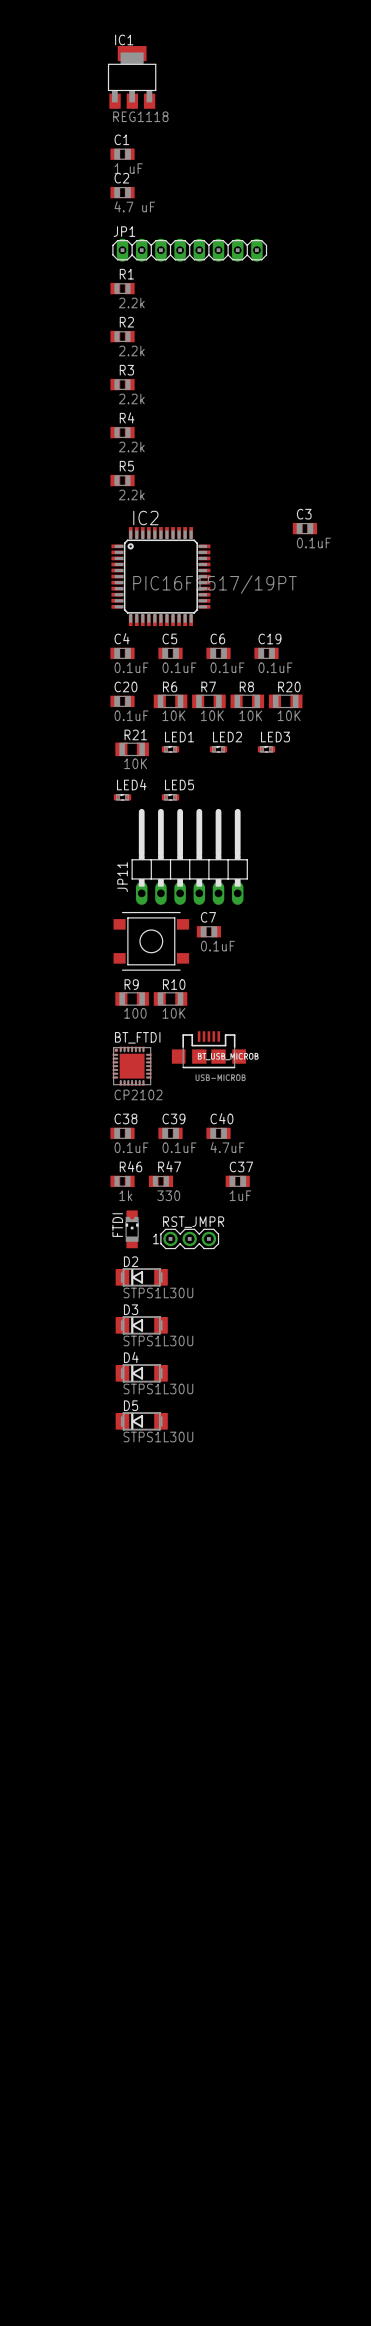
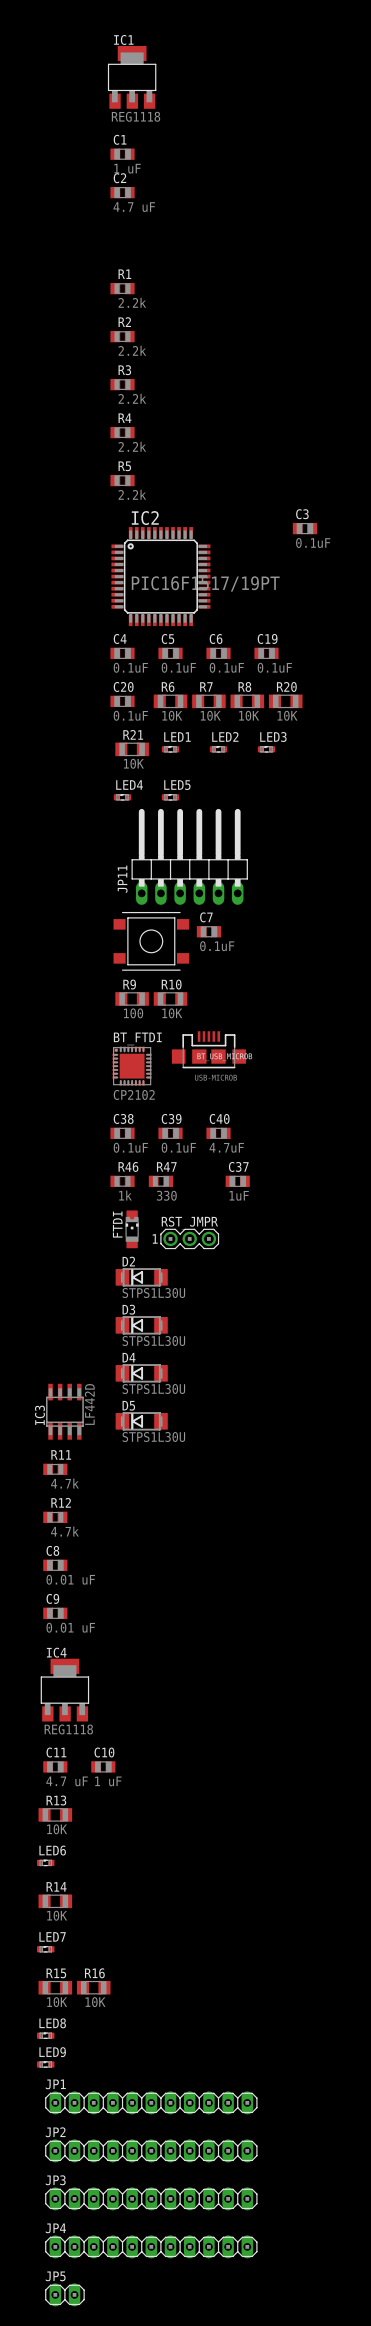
JP1 name position: JP1 (124, 231) -> JP1 (55, 2084)
JP1 footprint: [112, 238, 268, 262] -> [45, 2091, 258, 2115]
IC3: none -> LF442D (64, 1411)
R11: none -> 4.7k (55, 1469)
R12: none -> 4.7k (55, 1517)
C8: none -> 0.01 uF (55, 1565)
C9: none -> 0.01 uF (55, 1613)
IC4: none -> REG1118 (64, 1690)
C11: none -> 4.7 uF (55, 1766)
C10: none -> 1 uF (103, 1766)
R13: none -> 10K (55, 1814)
LED6: none -> (45, 1862)
R14: none -> 10K (55, 1901)
LED7: none -> (45, 1949)
R15: none -> 10K (55, 1987)
R16: none -> 10K (93, 1987)
LED8: none -> (45, 2035)
LED9: none -> (45, 2064)
JP2: none -> (151, 2150)
JP3: none -> (151, 2198)
JP4: none -> (151, 2246)
JP5: none -> (64, 2294)

